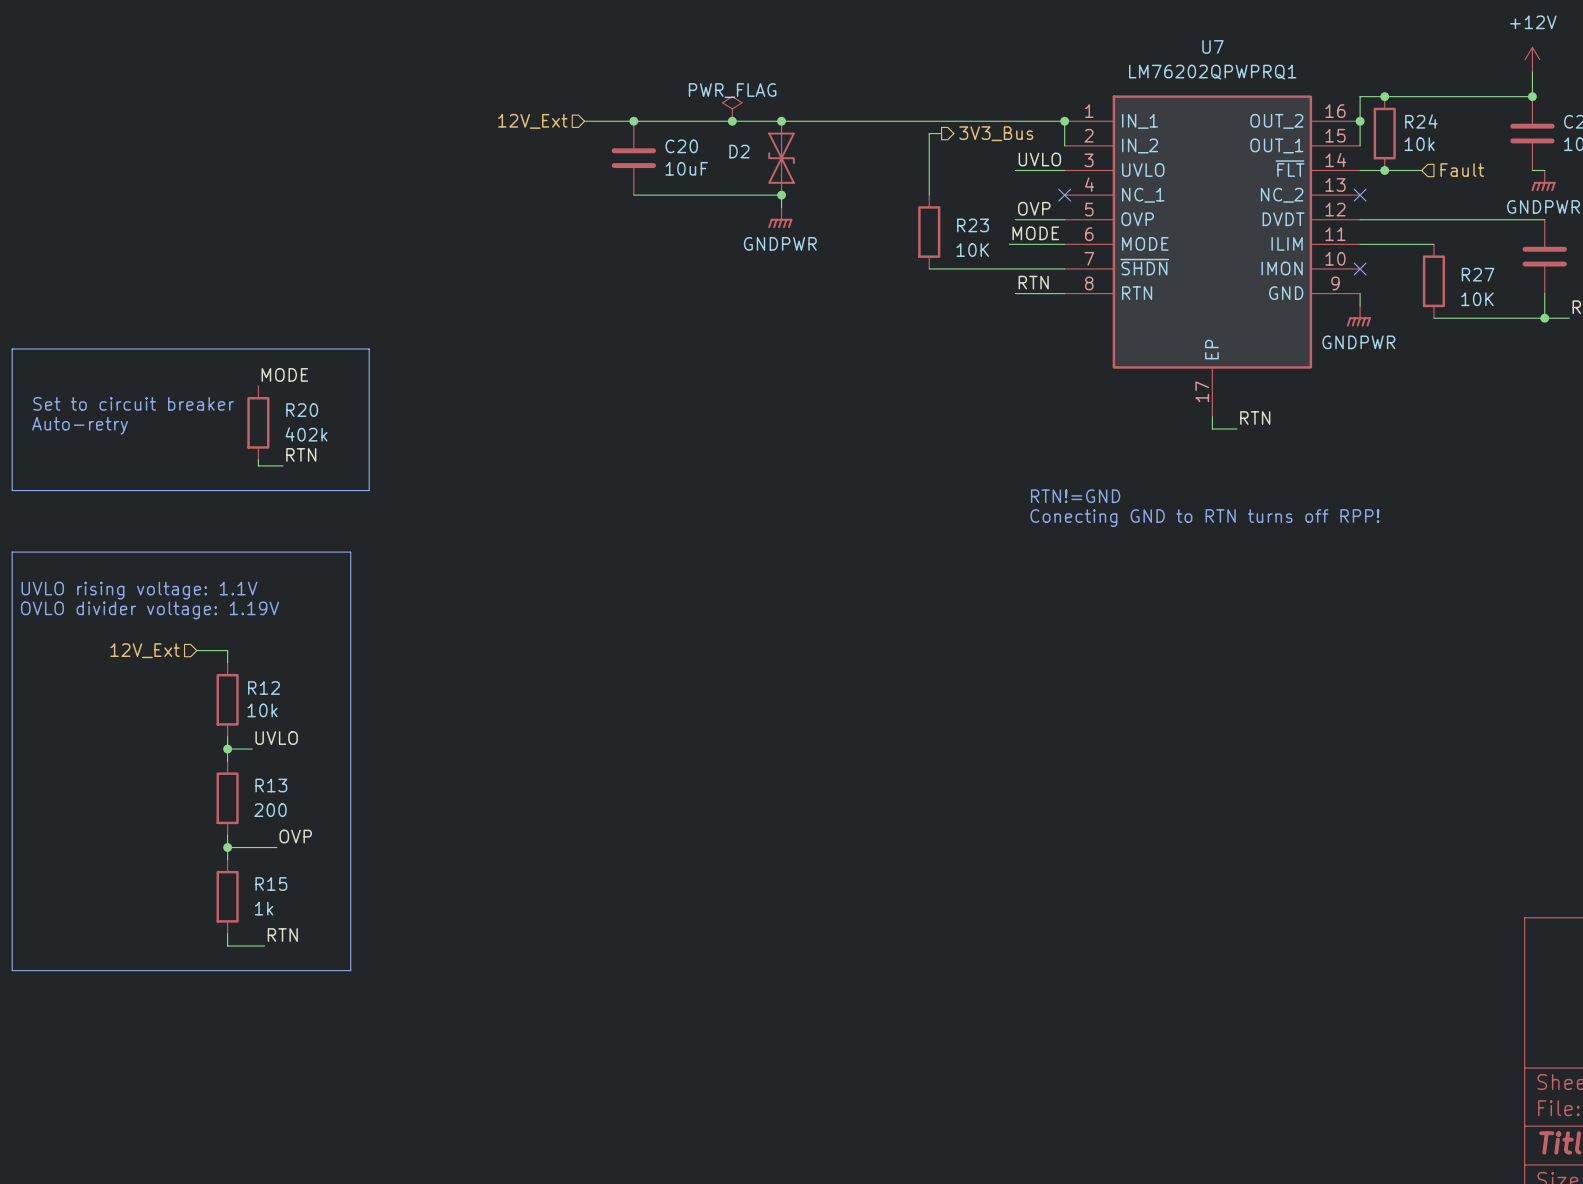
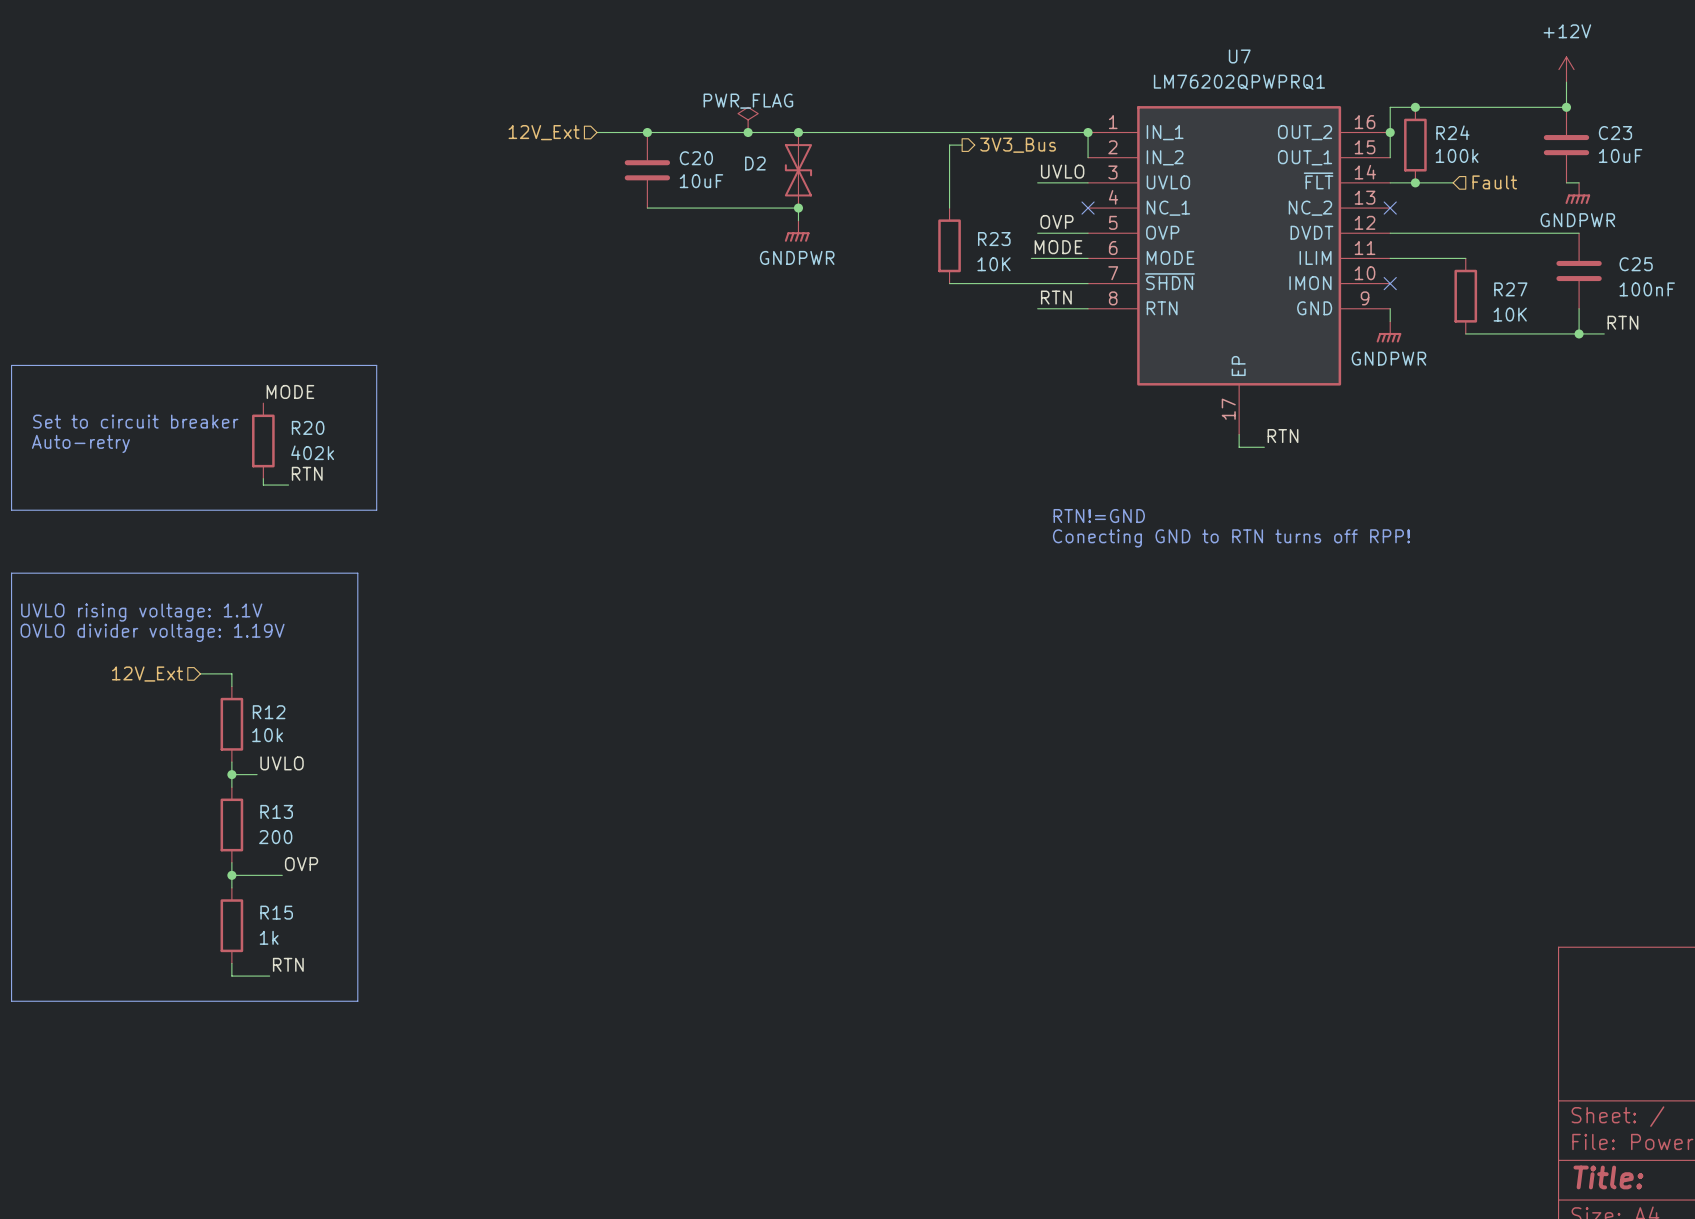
R24 value: 10k (1419, 144) -> 100k (1457, 155)

